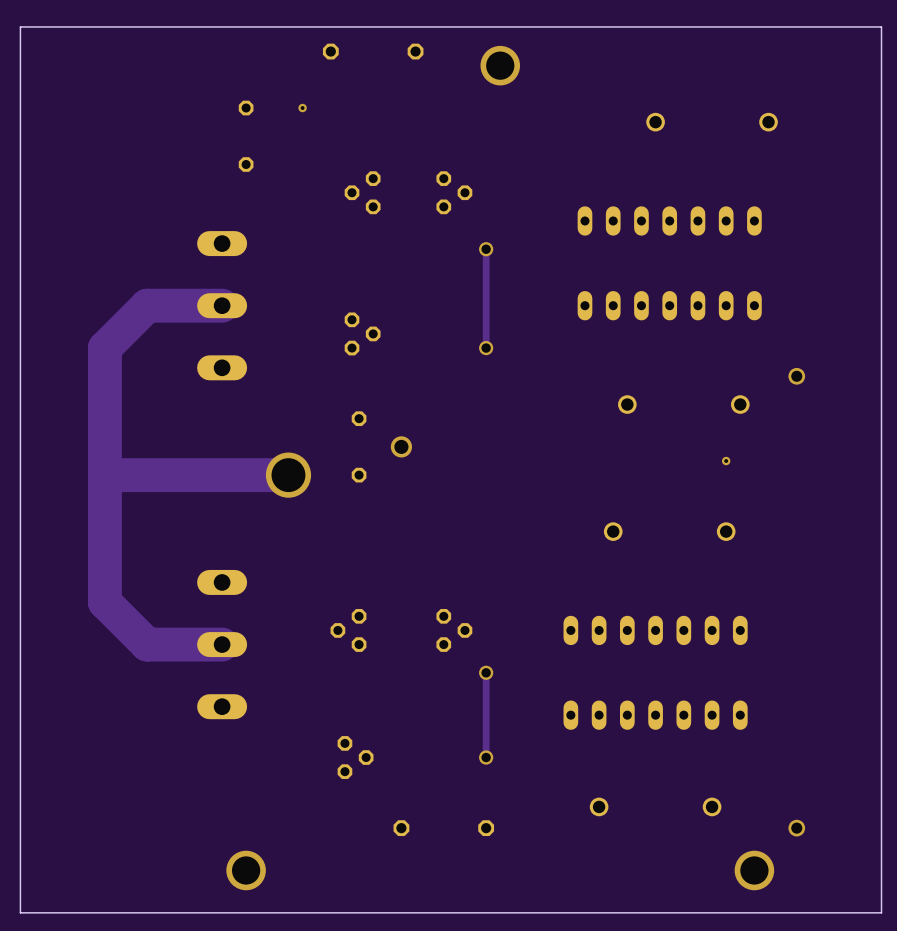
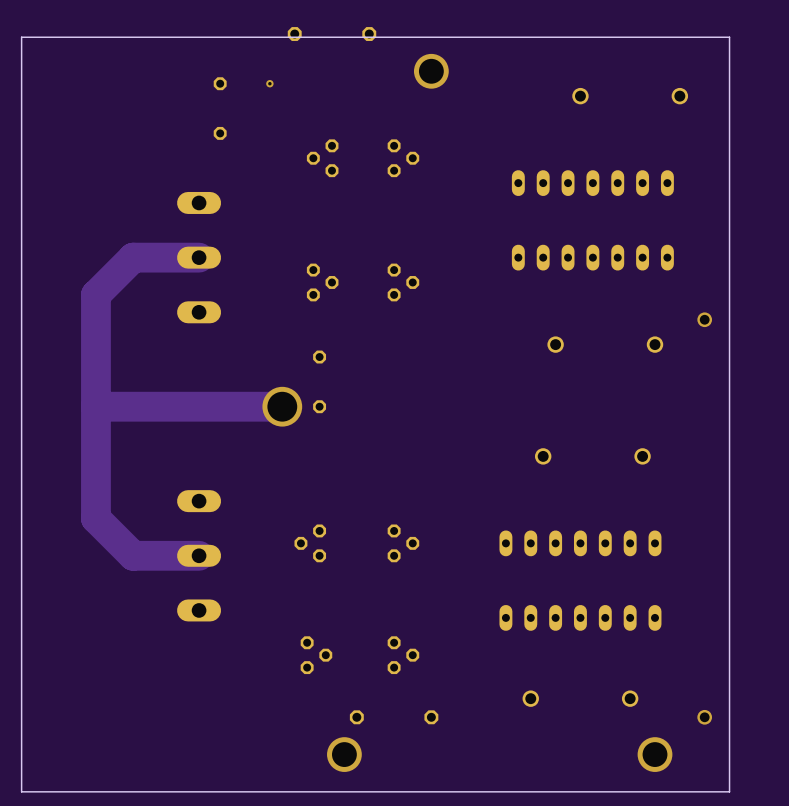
board edge: (20, 55) (20, 26) (881, 26) (881, 912) (825, 912) -> (21, 37) (729, 37) (729, 791)
via position: (500, 65) -> (431, 71)
track: (486, 249) (486, 348) -> none
via: (486, 249) -> none
part: none -> (403, 282)
via: (486, 348) -> none
via: (401, 446) -> none
via: (726, 461) -> none
via position: (288, 475) -> (282, 406)
track: (486, 672) (486, 757) -> none
via: (486, 672) -> none
part: none -> (403, 655)
via: (486, 757) -> none
via: (246, 870) -> none
via: none -> (344, 754)
via position: (754, 870) -> (655, 754)

